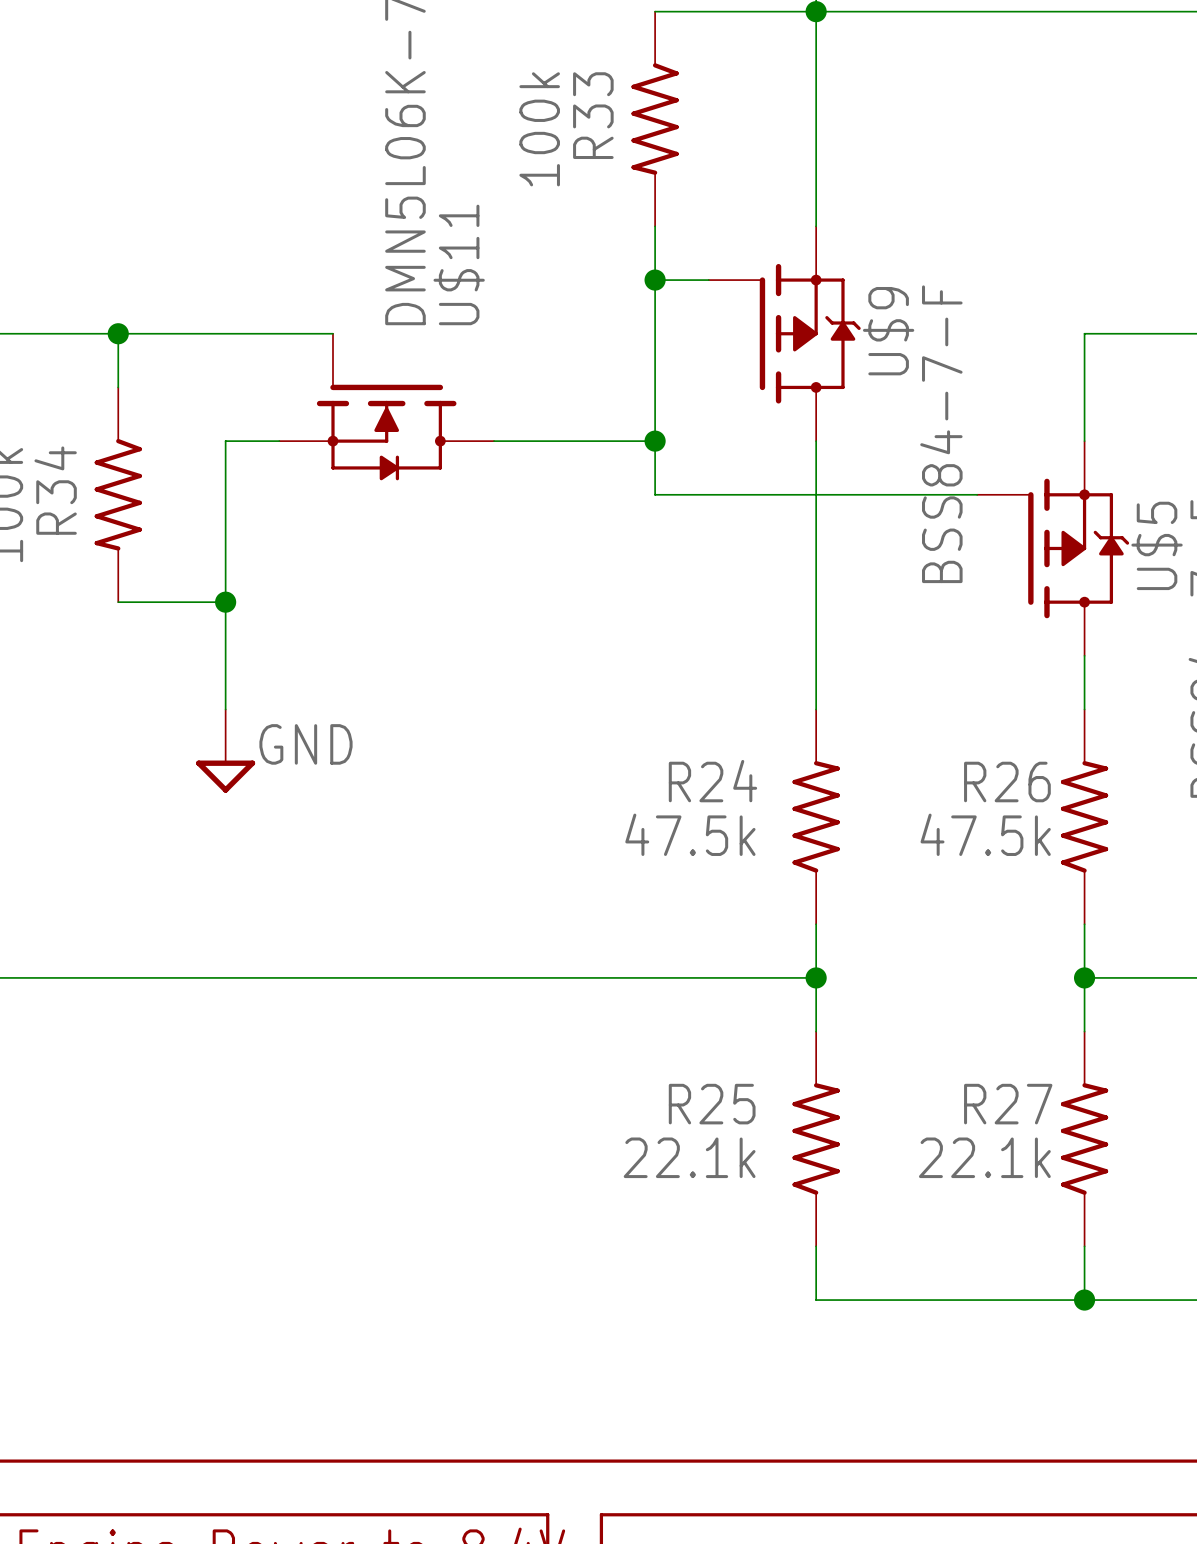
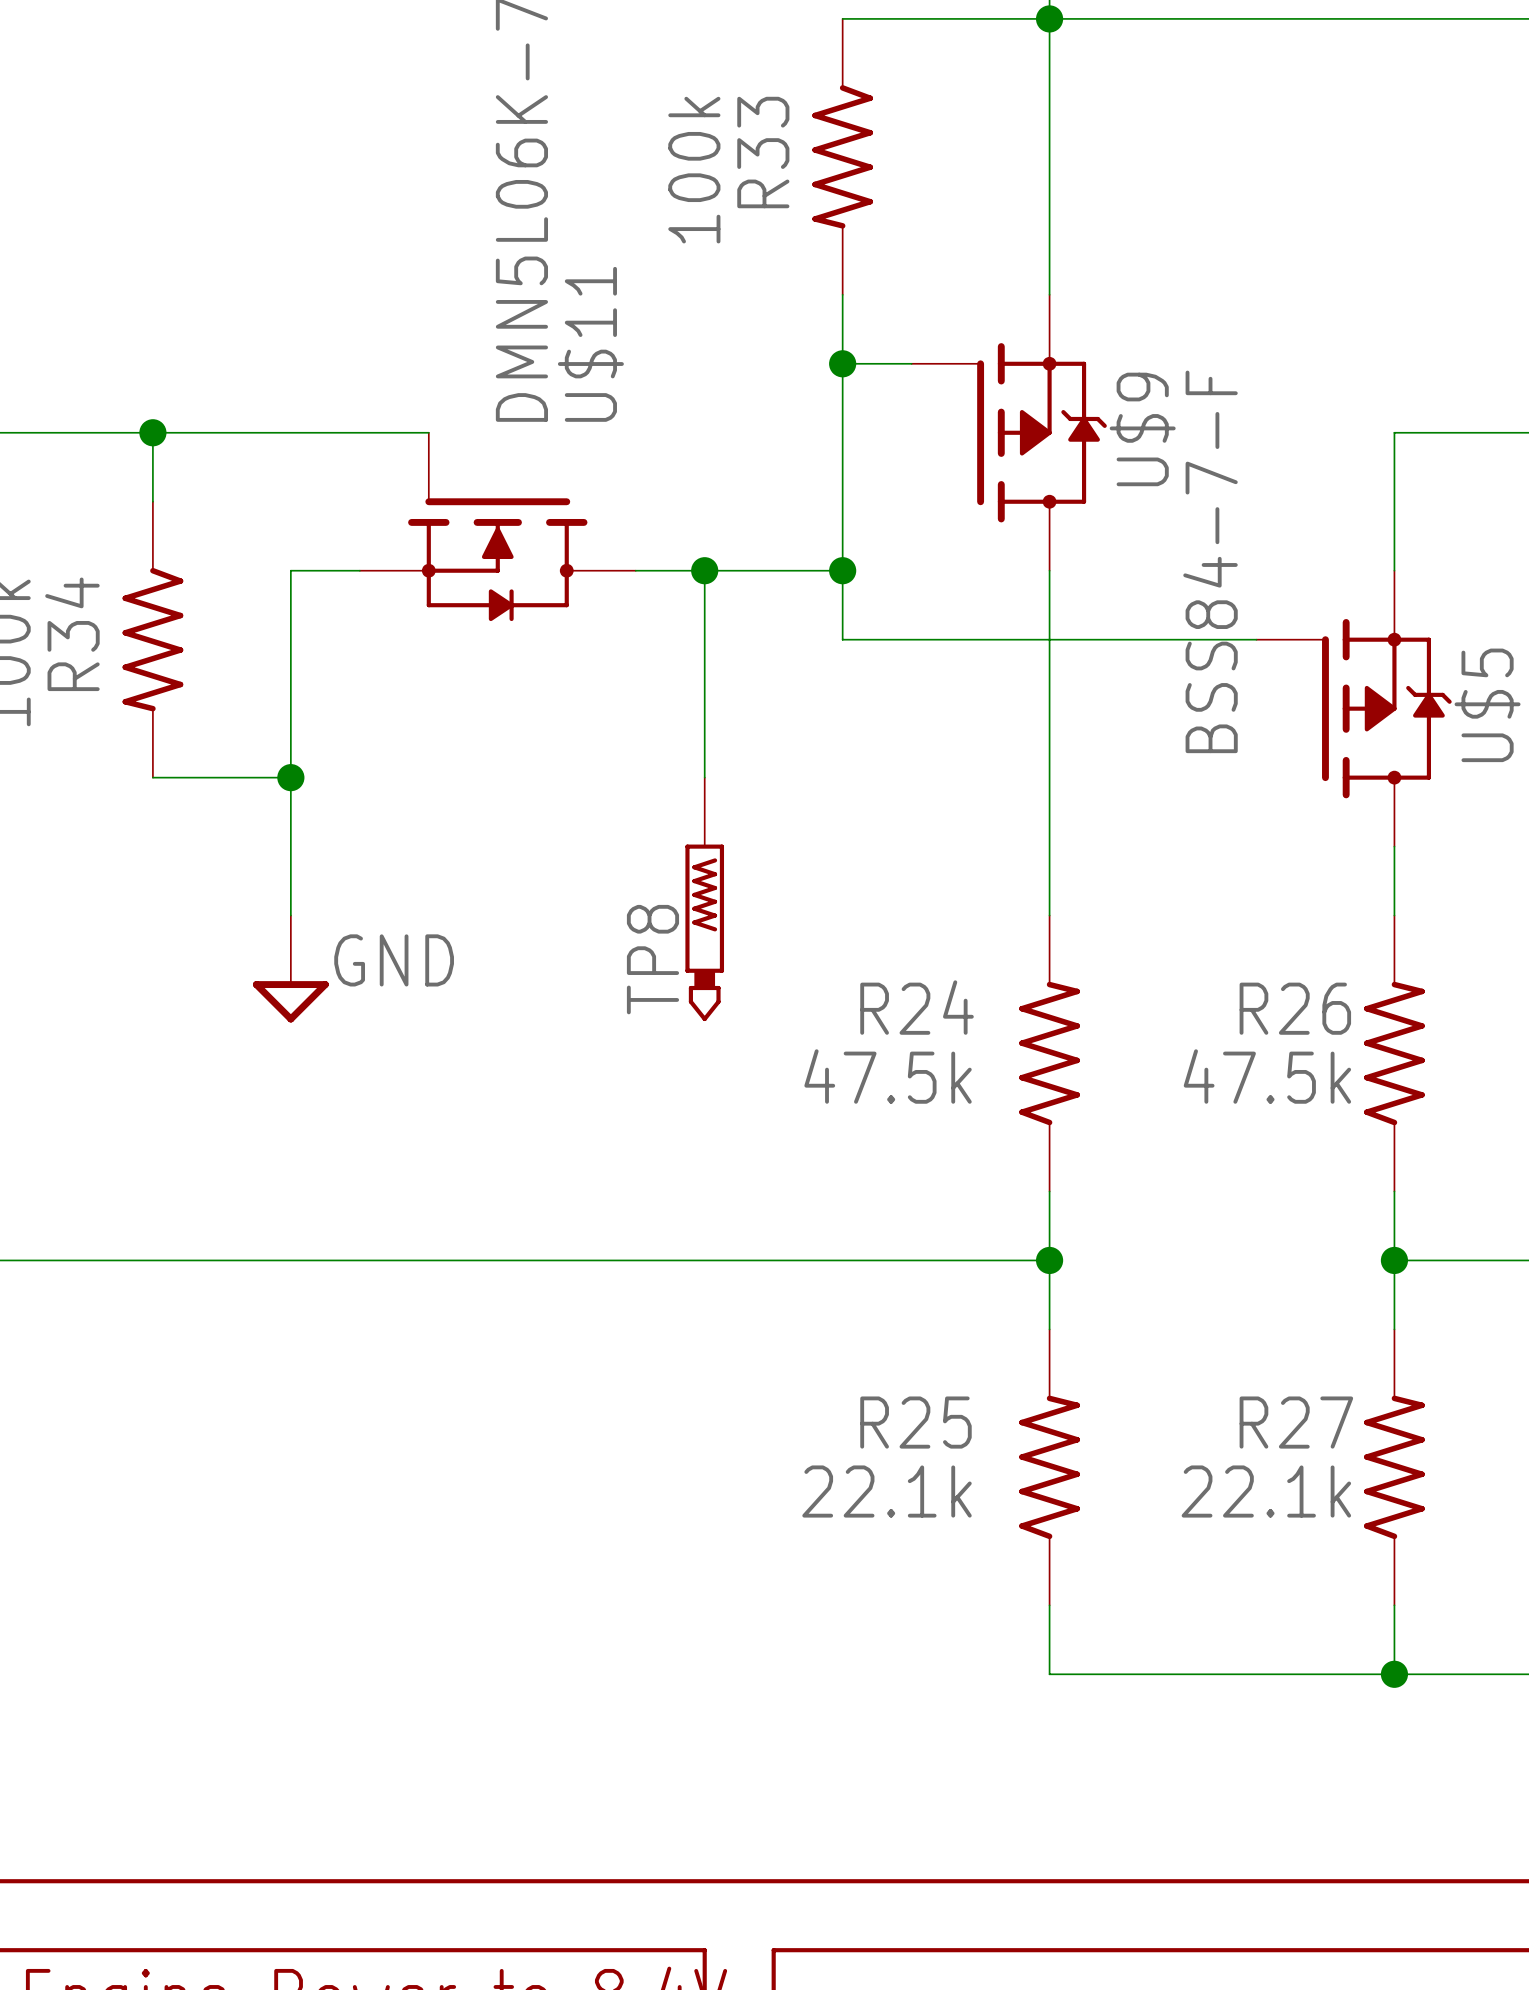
wire: none -> (704, 570) (704, 777)
junction: none -> (704, 570)
TP8: none -> (704, 899)

